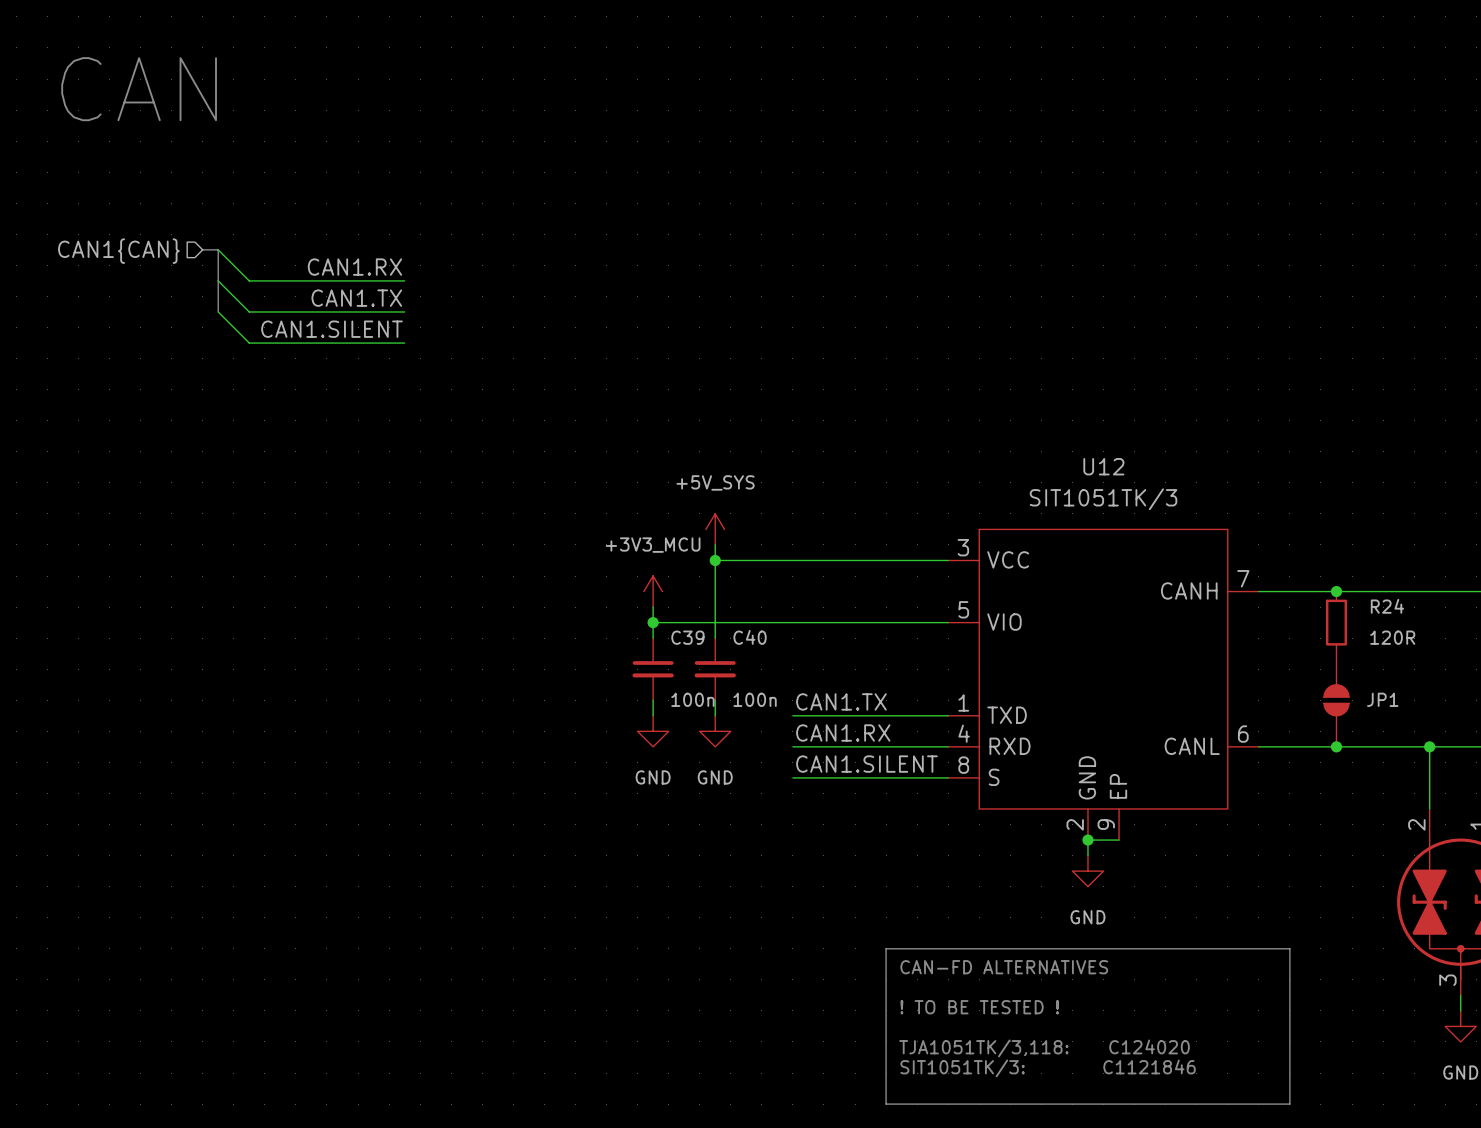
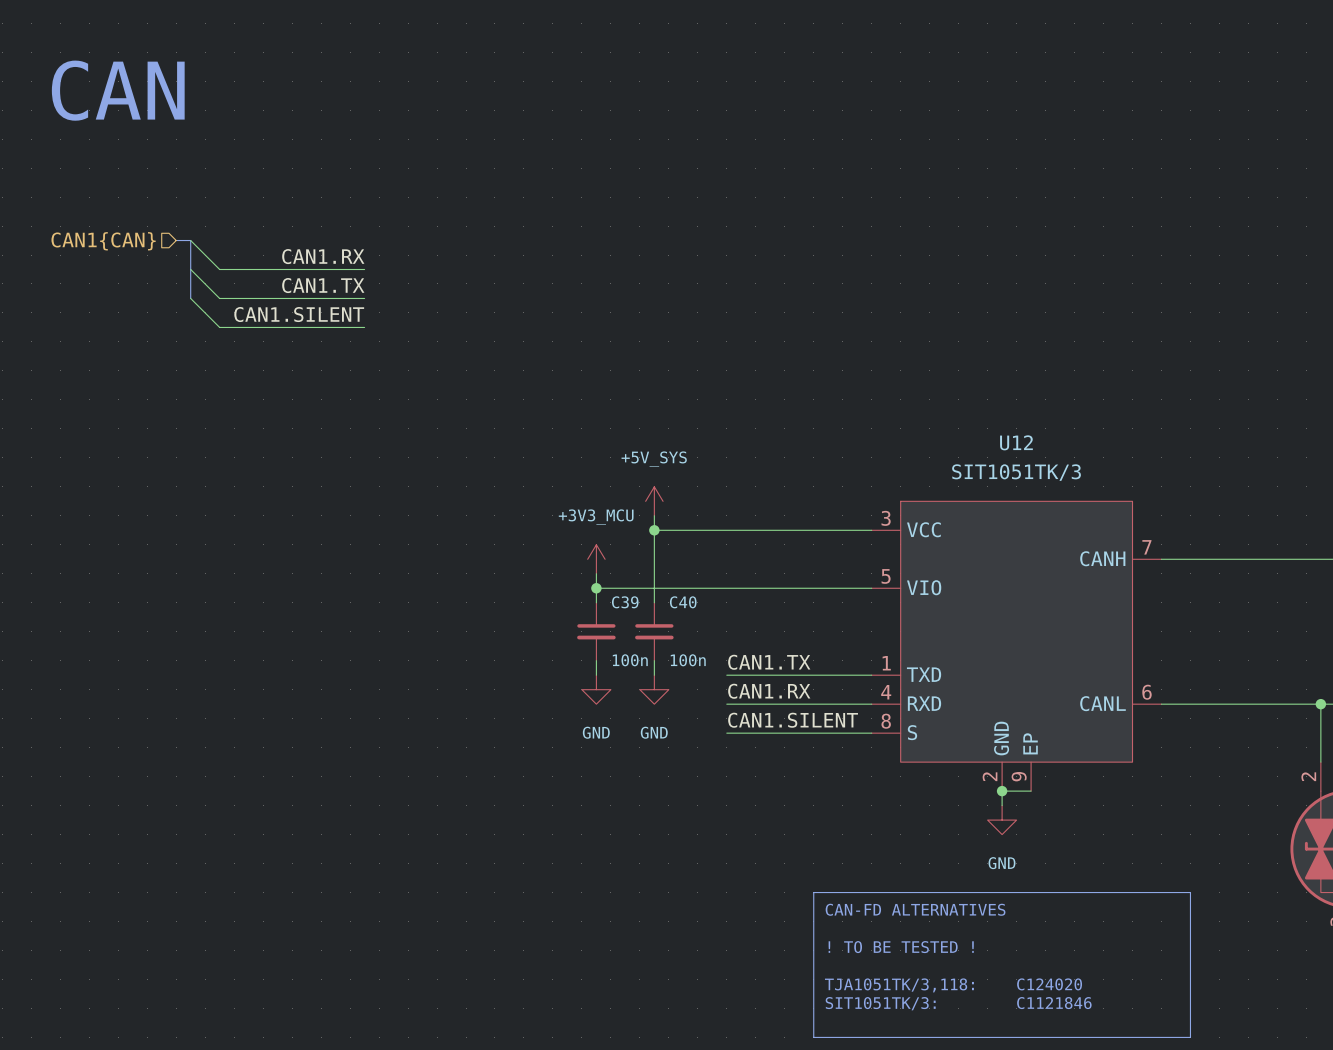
junction: (1336, 591) -> none
R24: 120R (1336, 622) -> none
JP1: (1336, 700) -> none
junction: (1336, 746) -> none

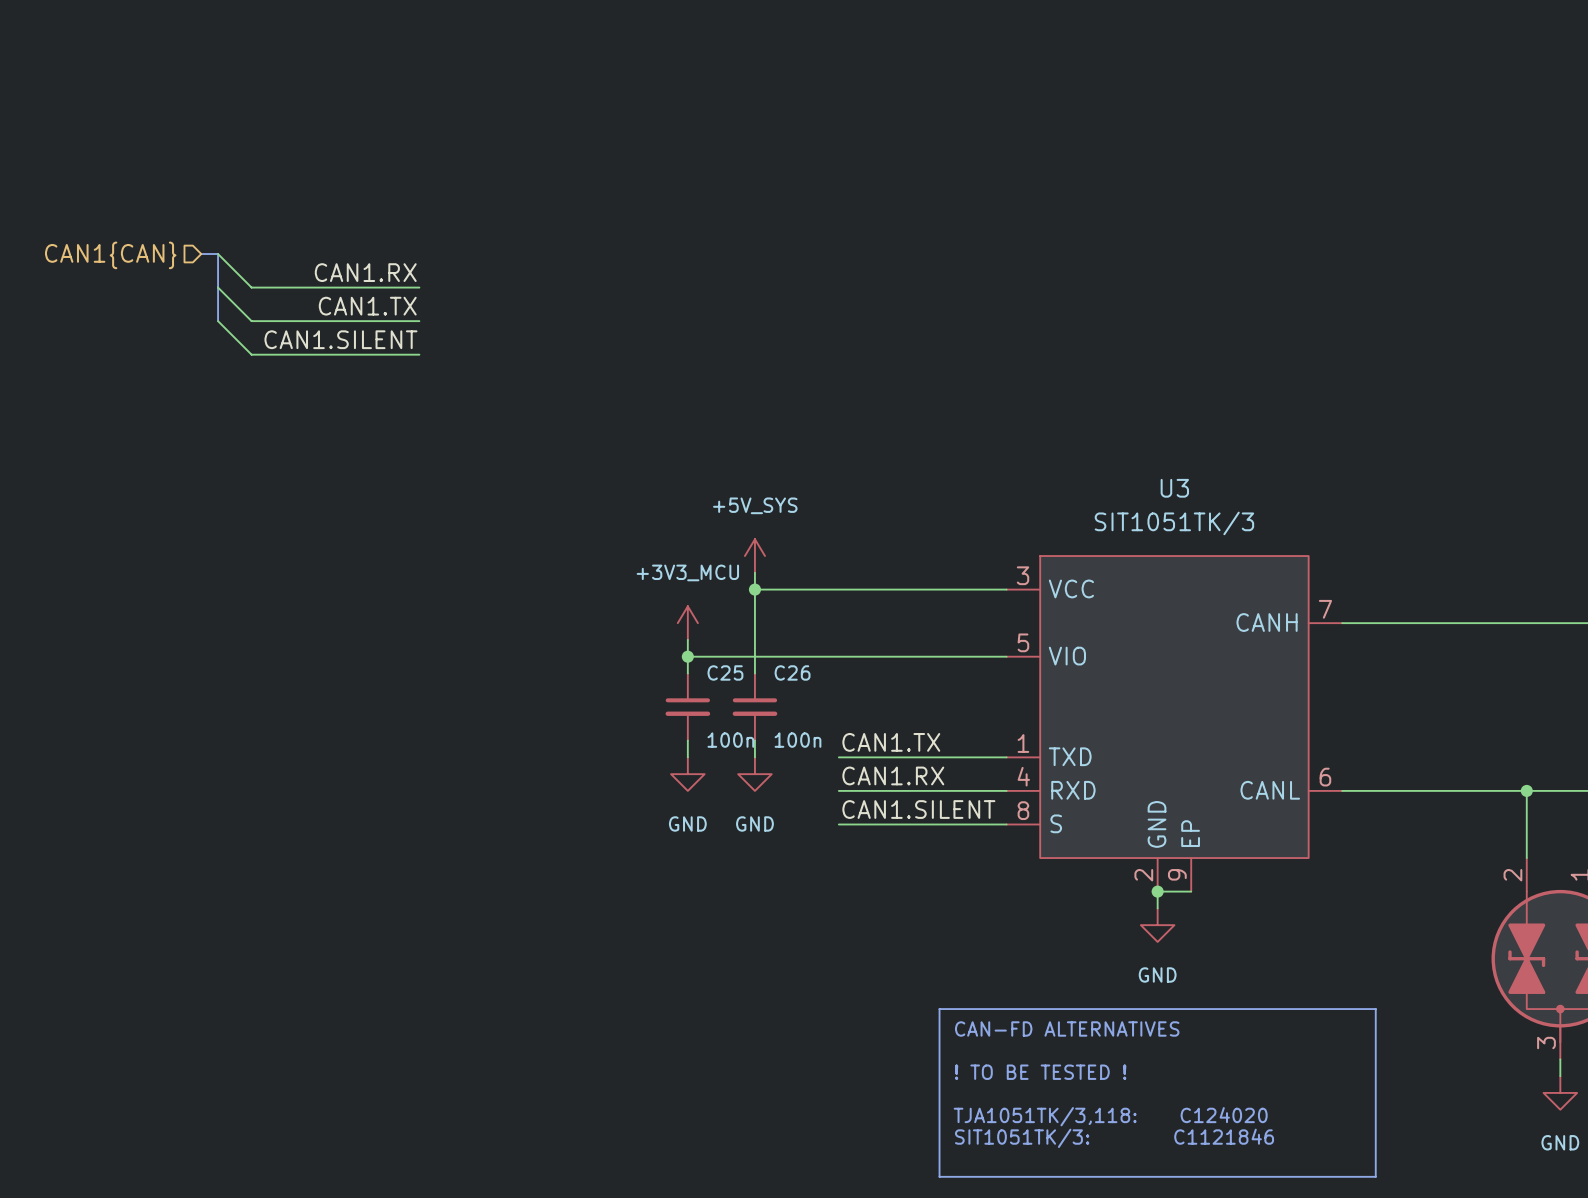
text: CAN (118, 90) -> none
U12 name: U12 (1016, 442) -> U3 (1174, 488)
C39 name: C39 (625, 602) -> C25 (725, 672)
C40 name: C40 (683, 602) -> C26 (792, 672)

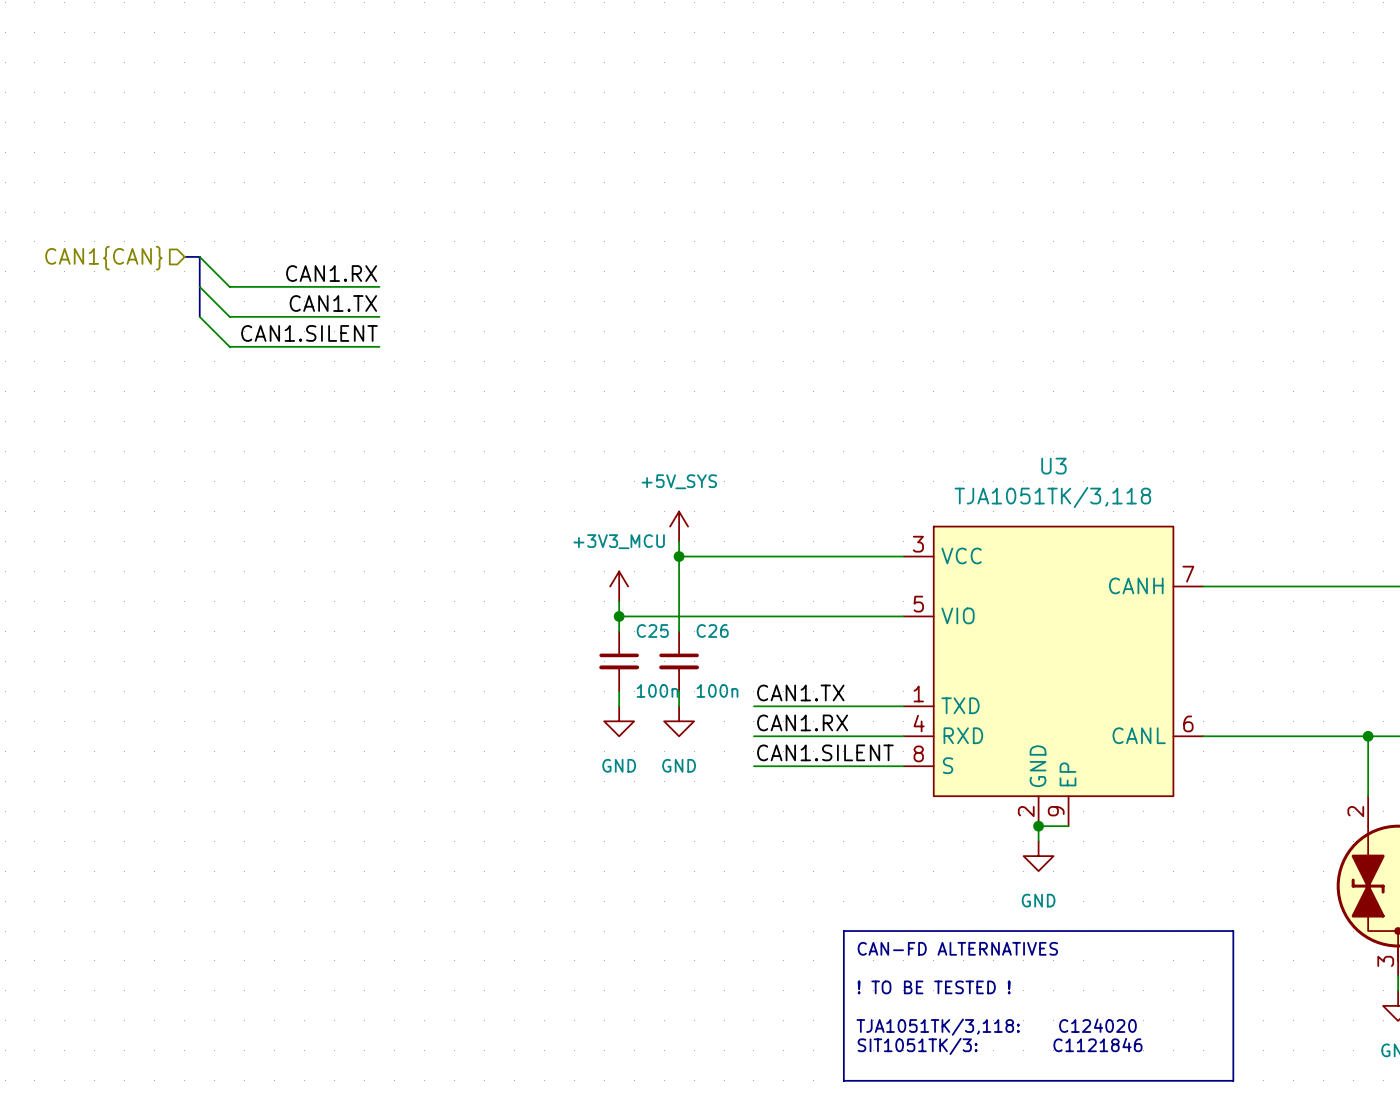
U3 value: SIT1051TK/3 (1174, 523) -> TJA1051TK/3,118 (1052, 497)

